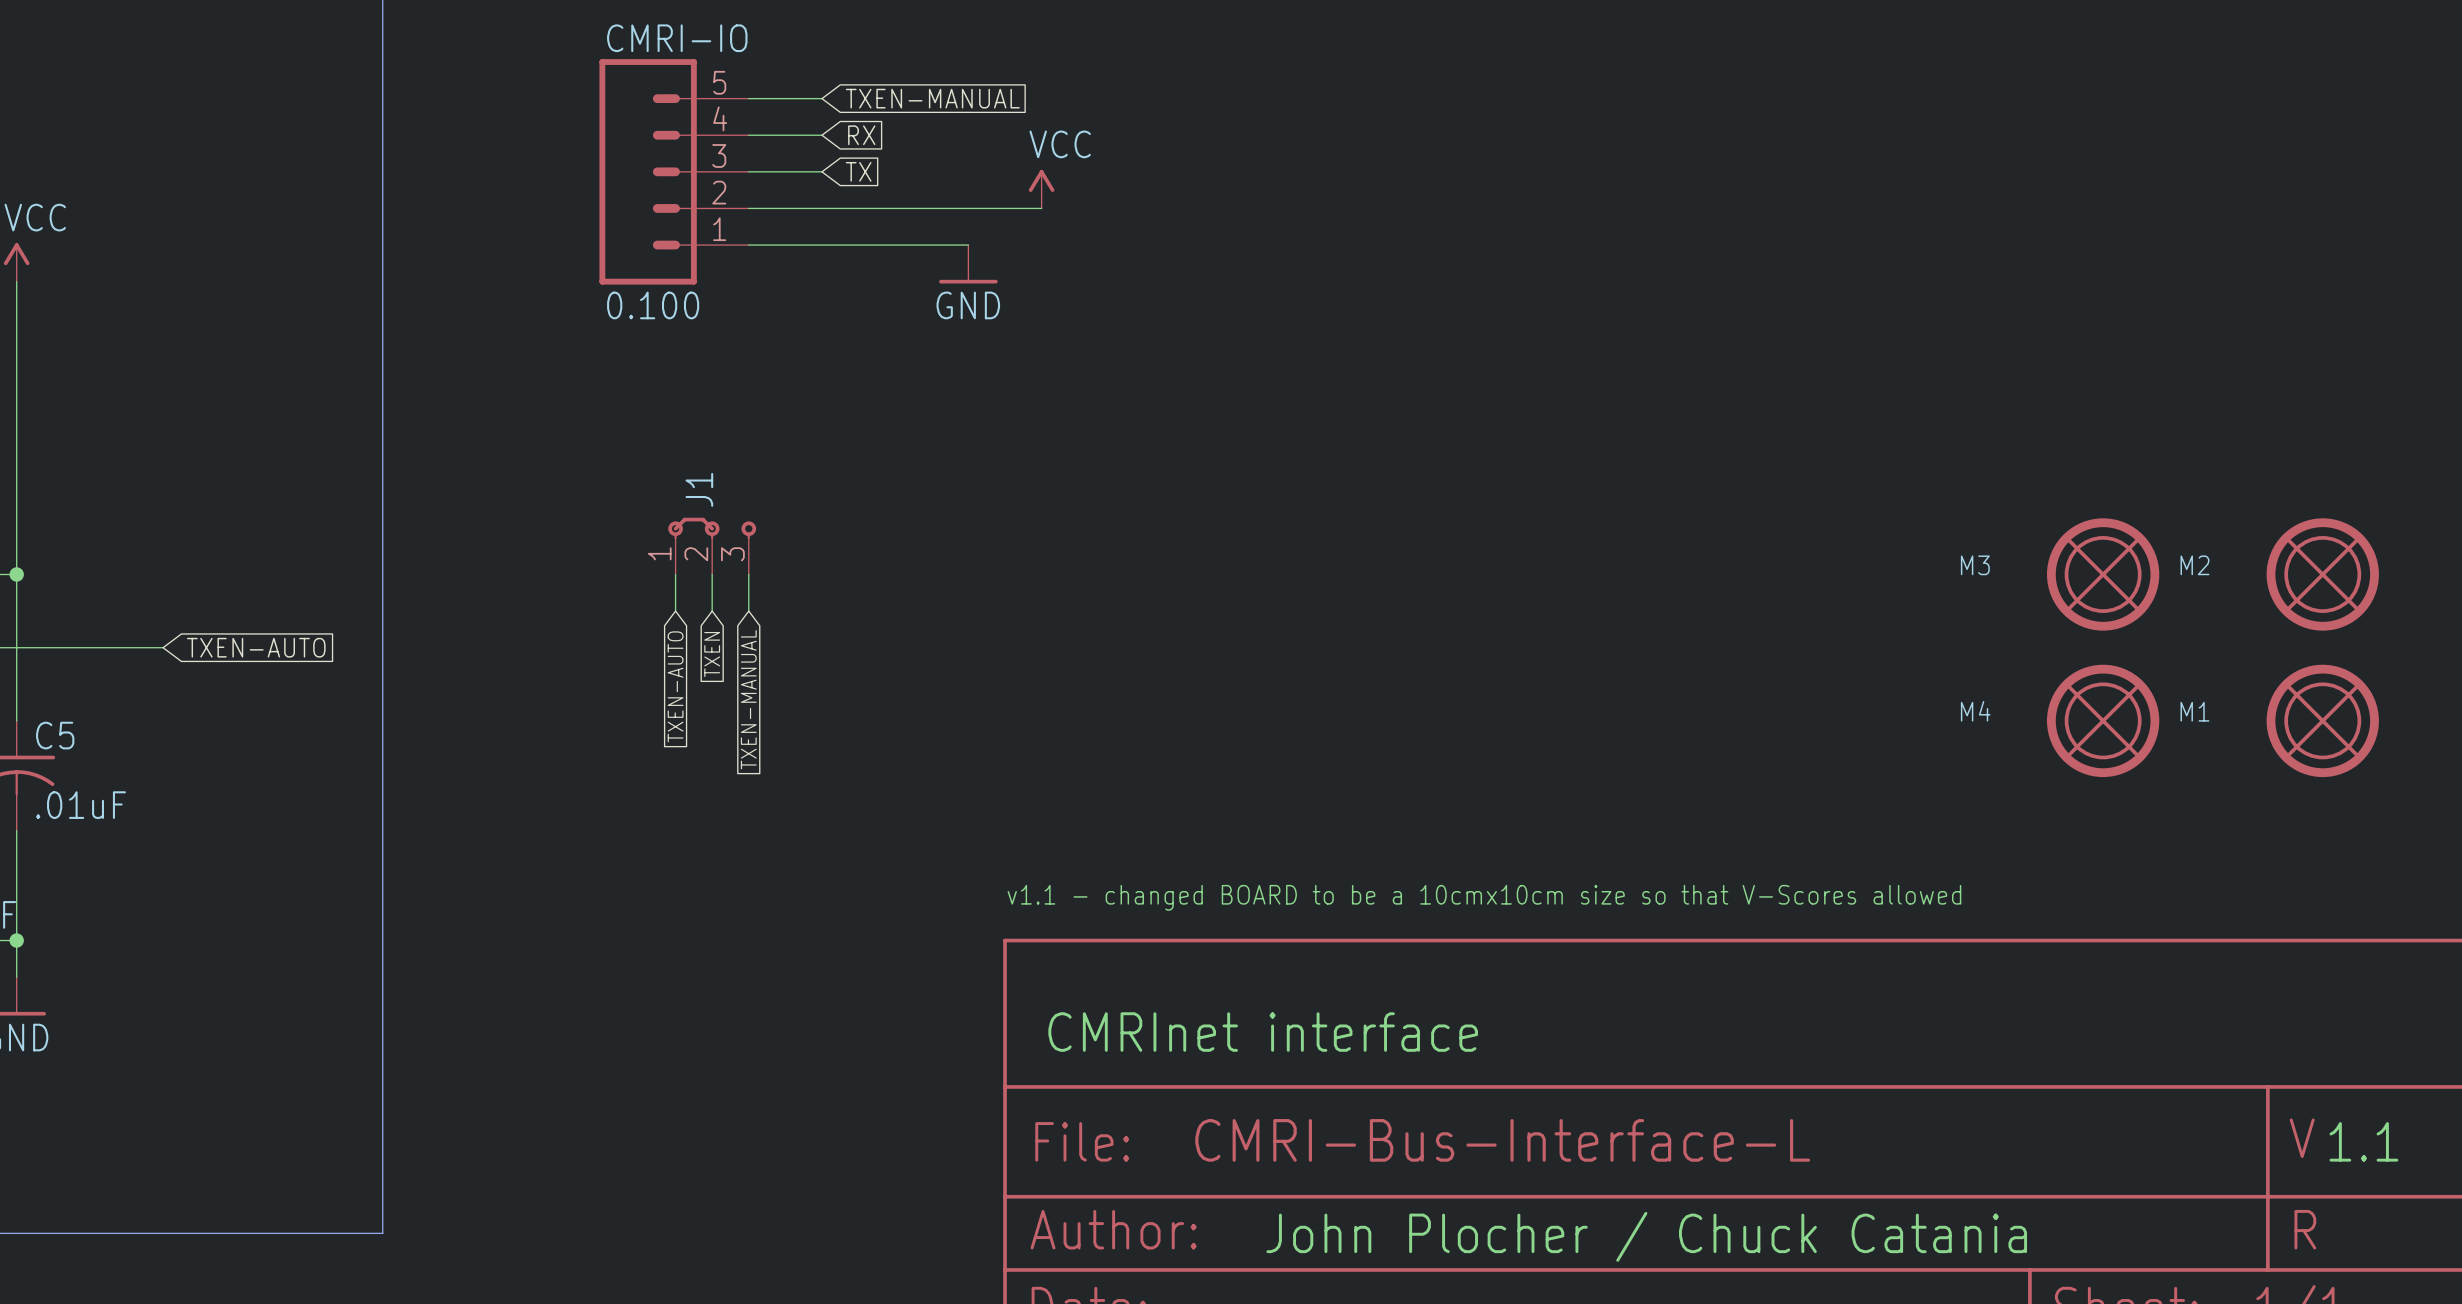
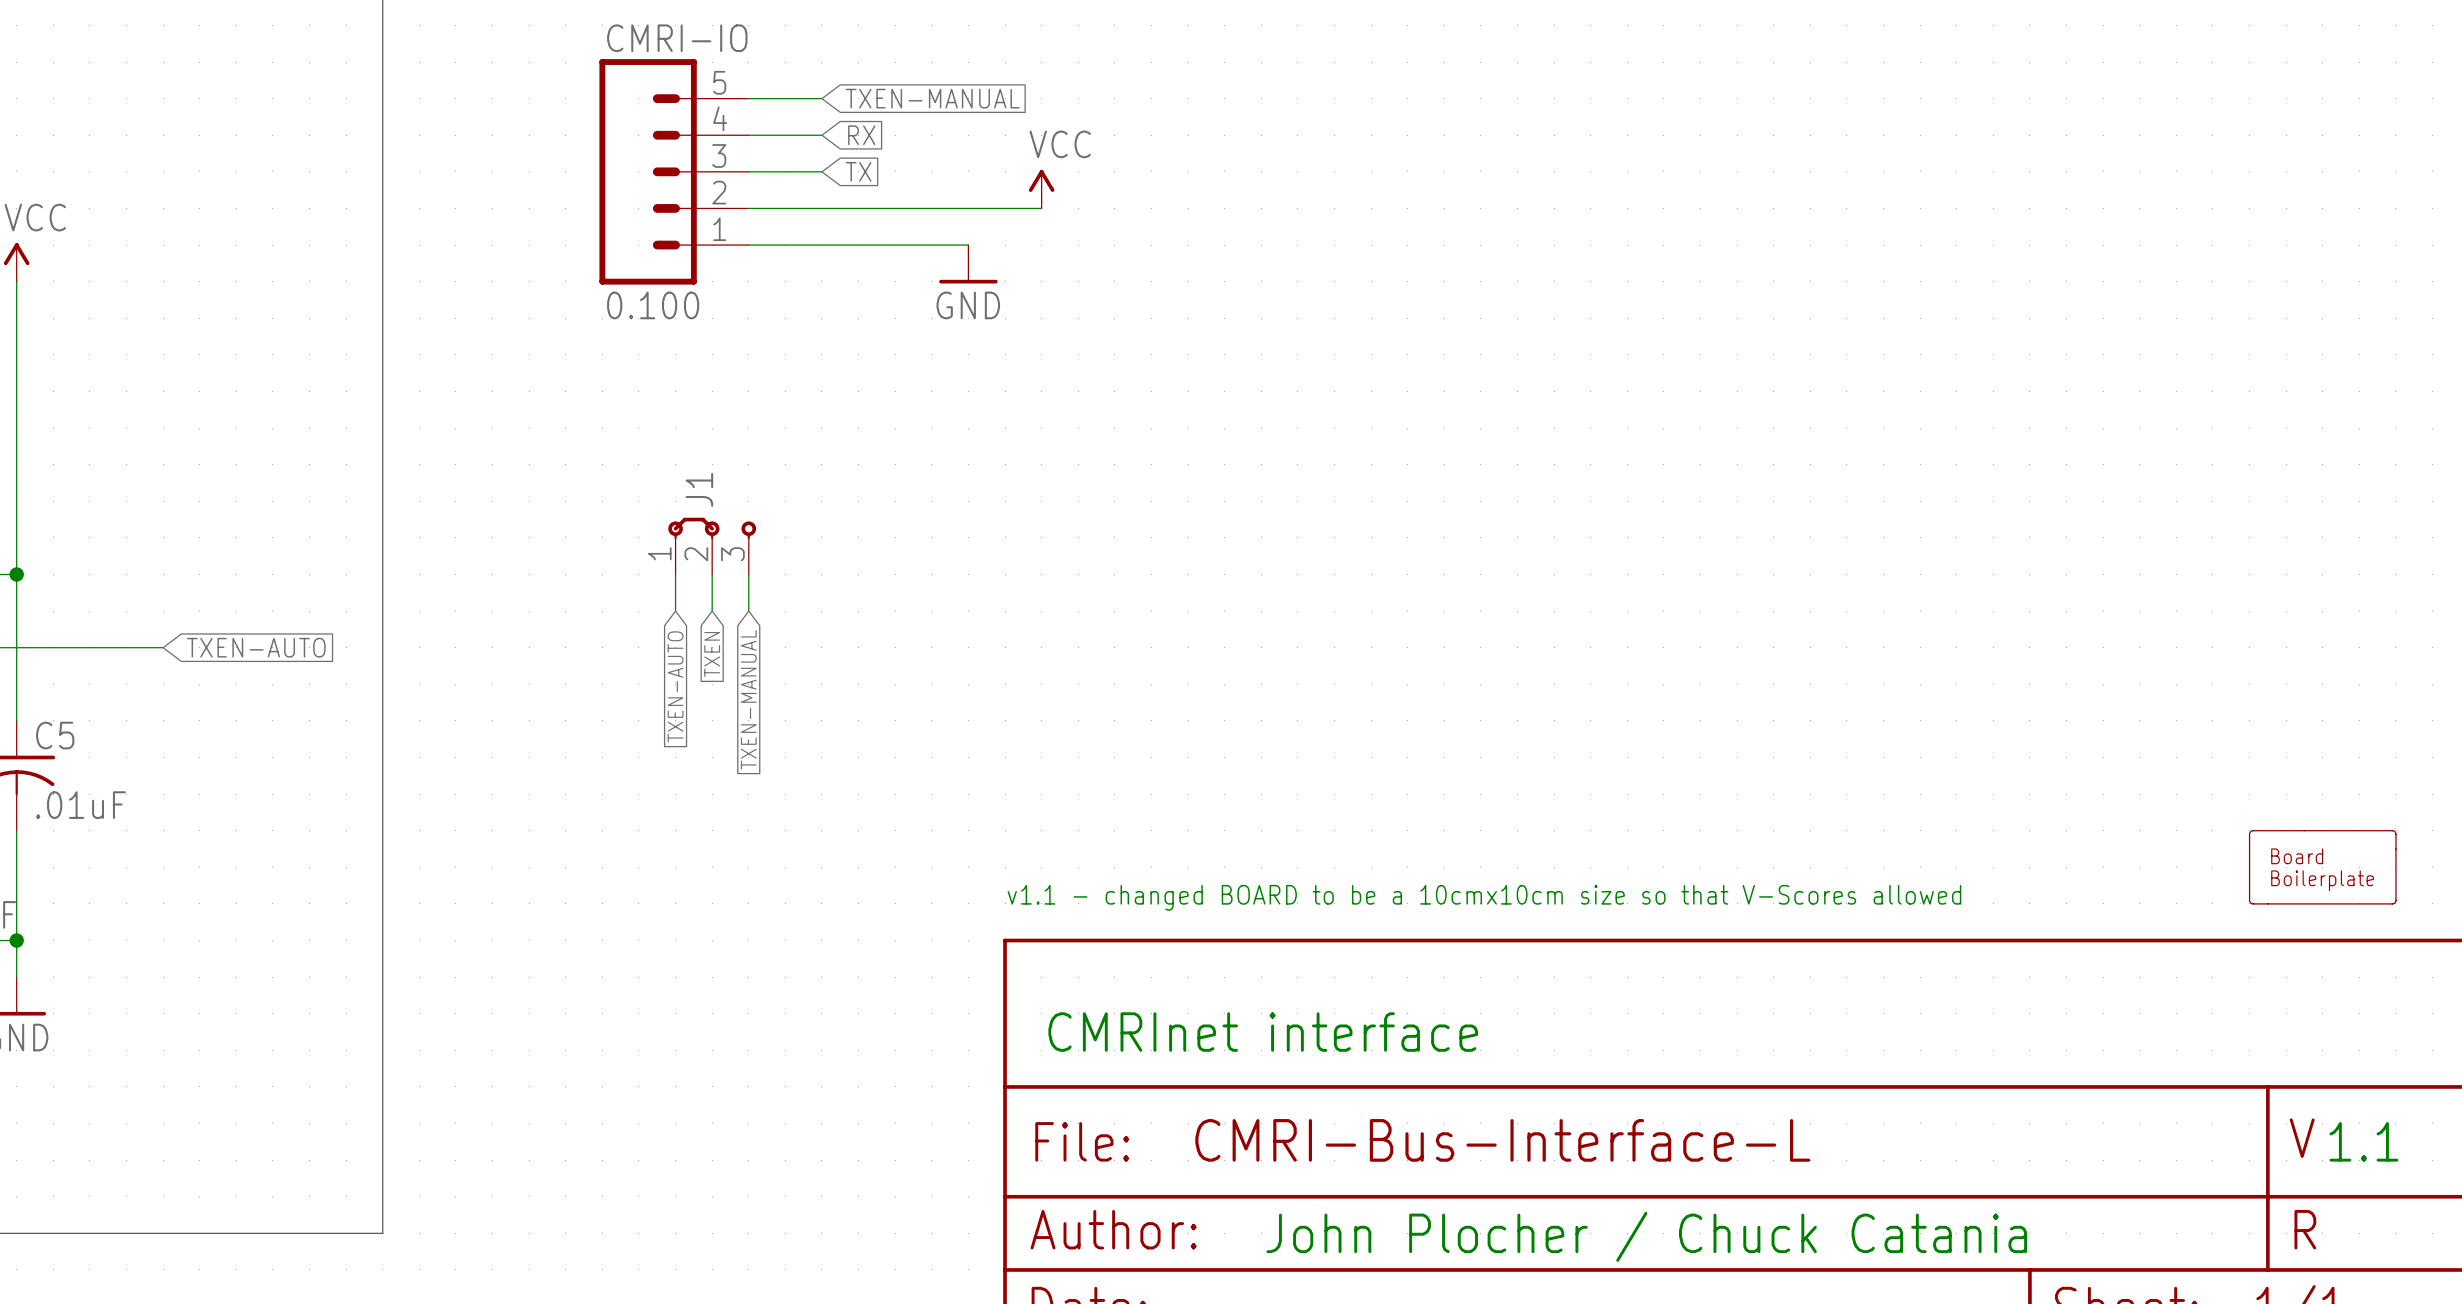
M3: (2103, 574) -> none
M2: (2322, 574) -> none
M4: (2103, 720) -> none
M1: (2322, 720) -> none
part: none -> (2322, 867)

